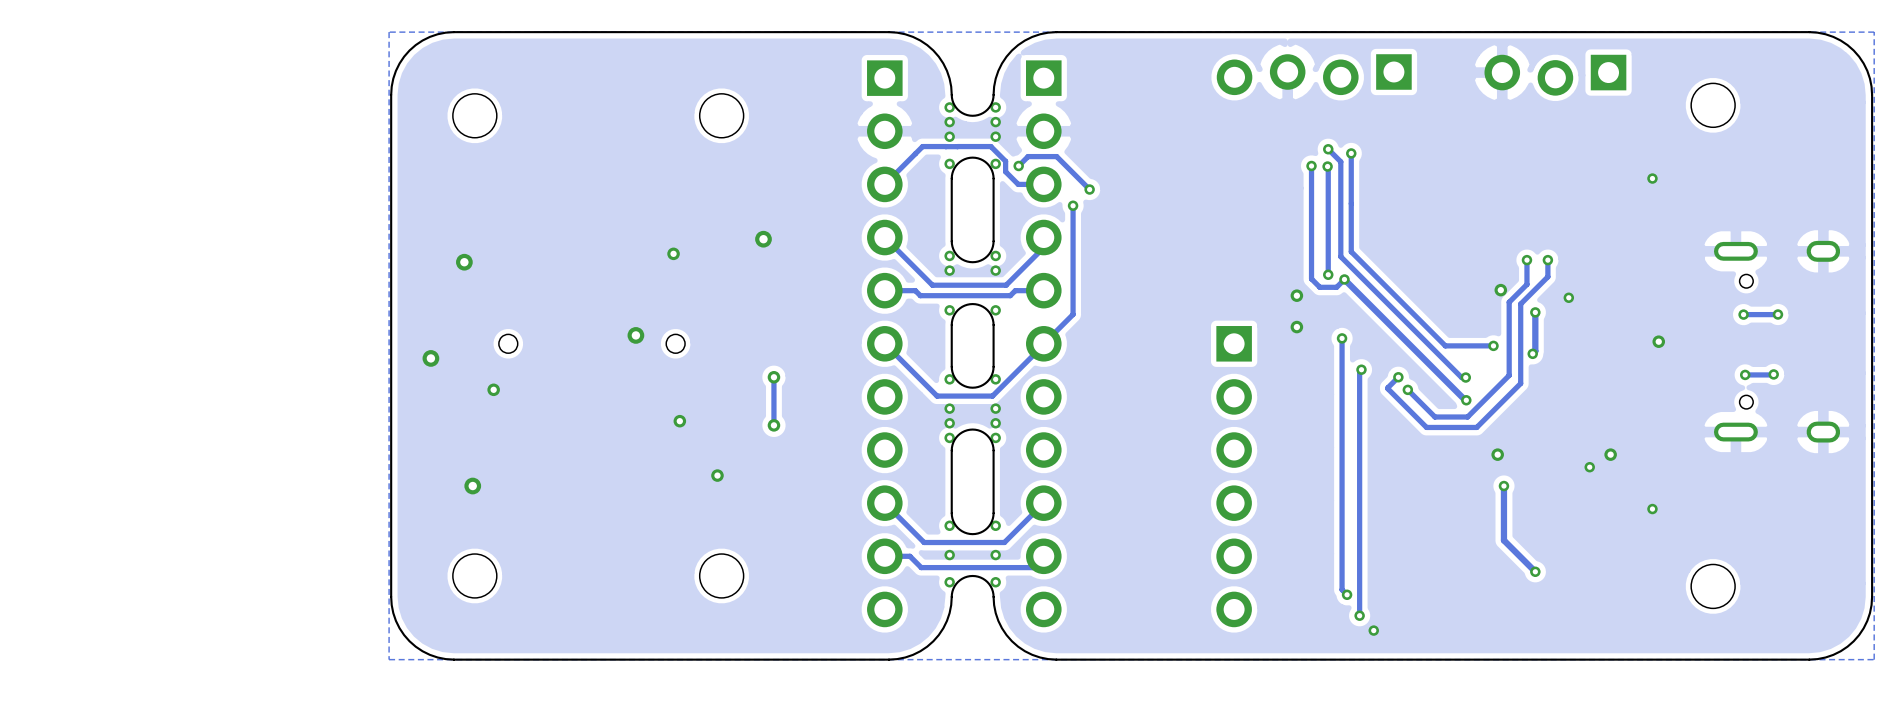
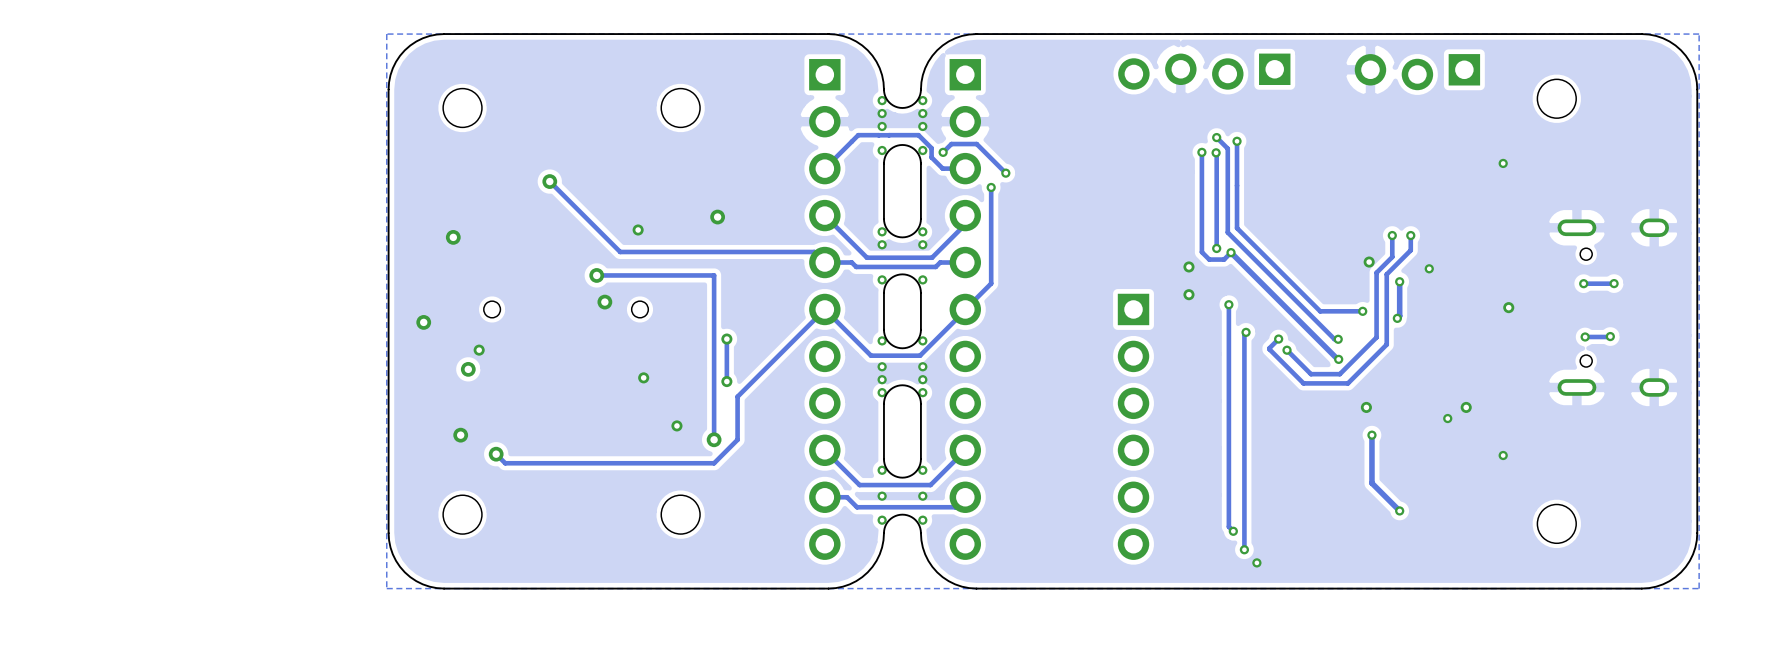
track: none -> (549, 181) (620, 251) (814, 251) (824, 262)
via: none -> (549, 181)
track: none -> (596, 275) (714, 275) (714, 439)
via: none -> (596, 275)
track: none -> (824, 309) (737, 396) (737, 439) (714, 463) (505, 463) (496, 454)
via: none -> (468, 369)
via: none -> (714, 439)
via: none -> (496, 454)

